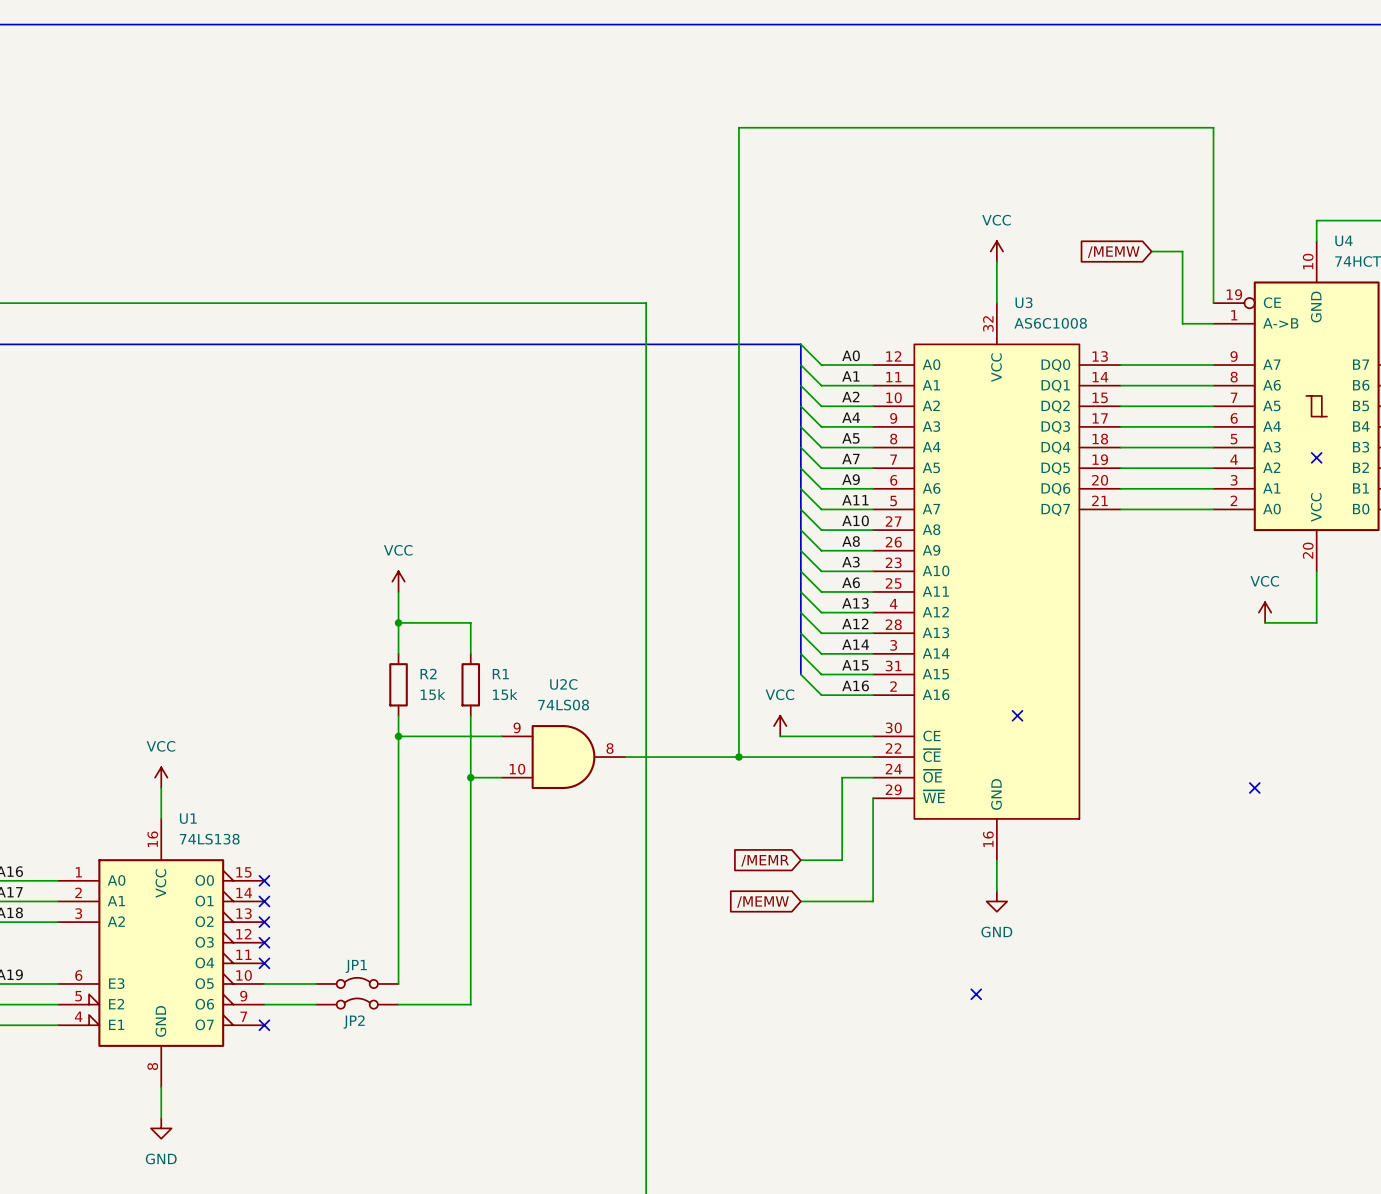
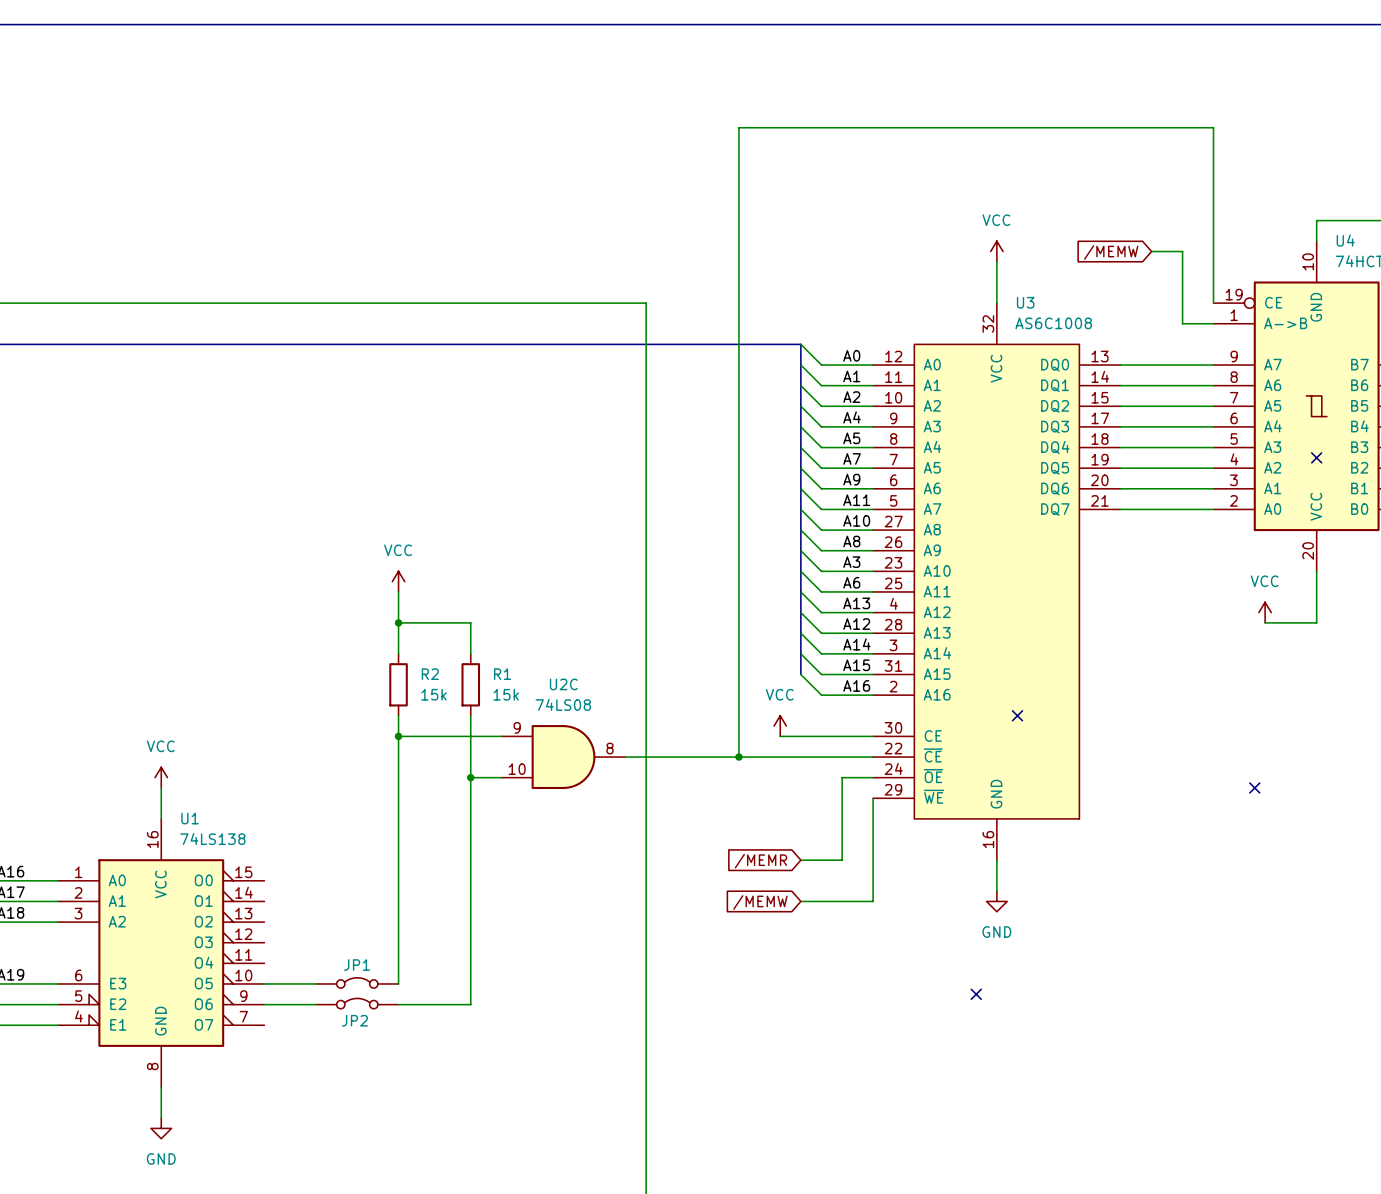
no-connect mark: (264, 880) -> none
no-connect mark: (264, 901) -> none
no-connect mark: (264, 922) -> none
no-connect mark: (264, 942) -> none
no-connect mark: (264, 963) -> none
no-connect mark: (264, 1025) -> none

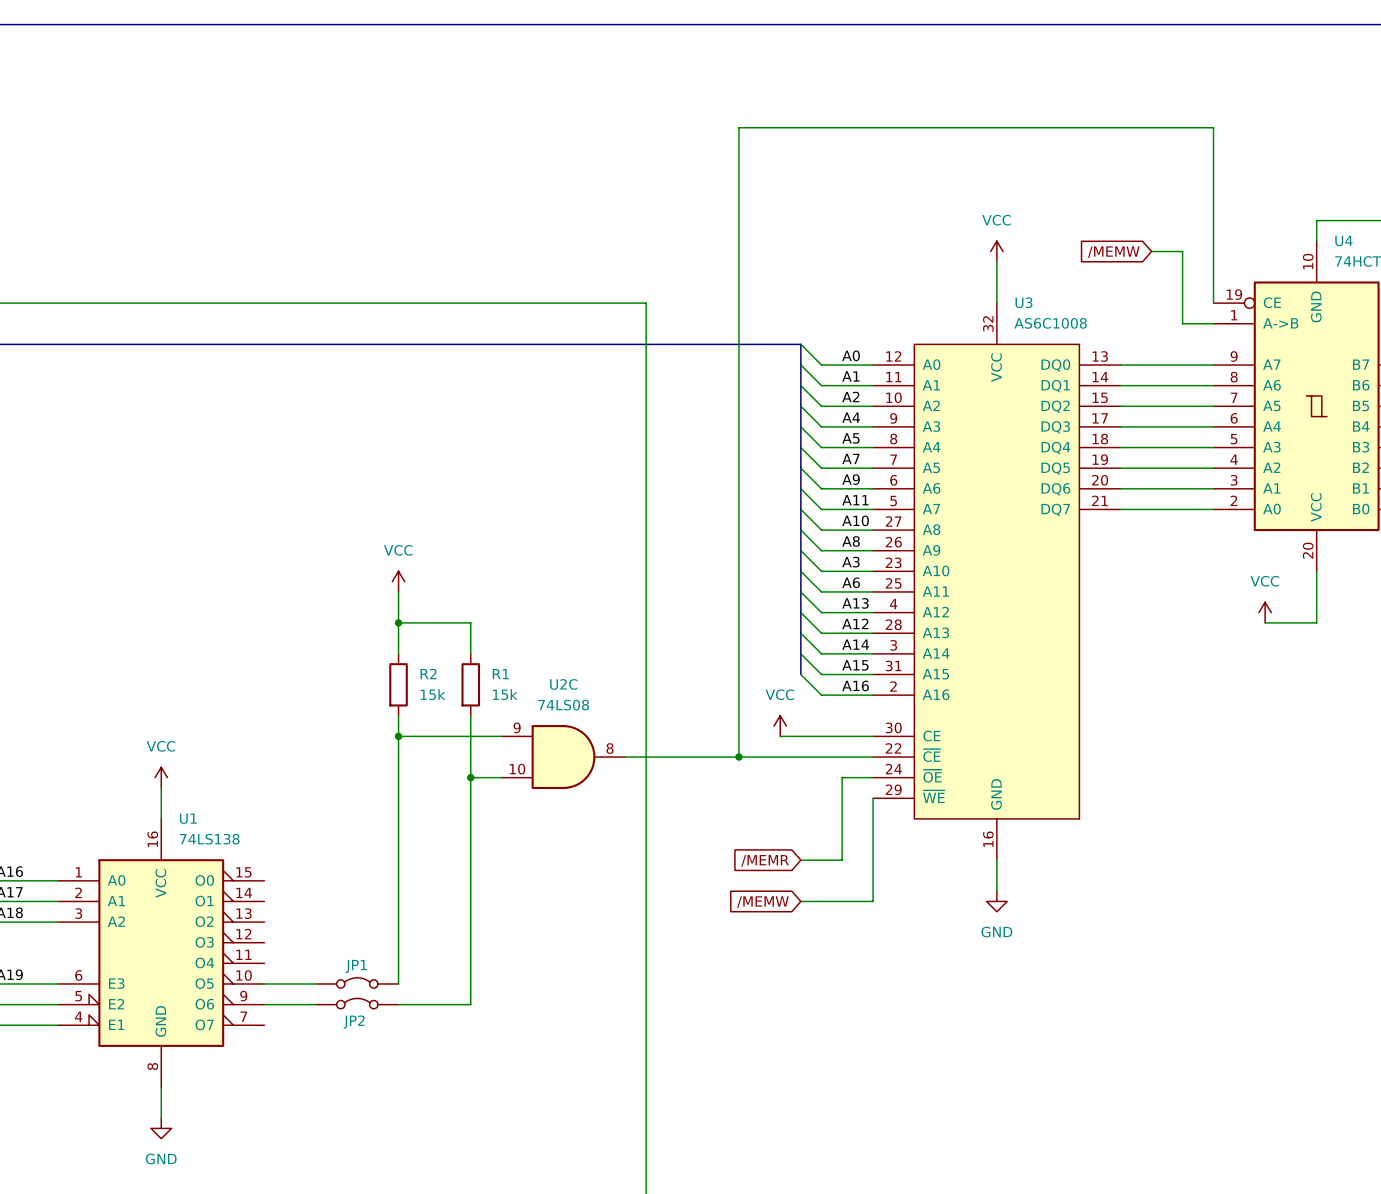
no-connect mark: (1316, 457) -> none
no-connect mark: (1017, 715) -> none
no-connect mark: (1254, 787) -> none
no-connect mark: (976, 994) -> none

